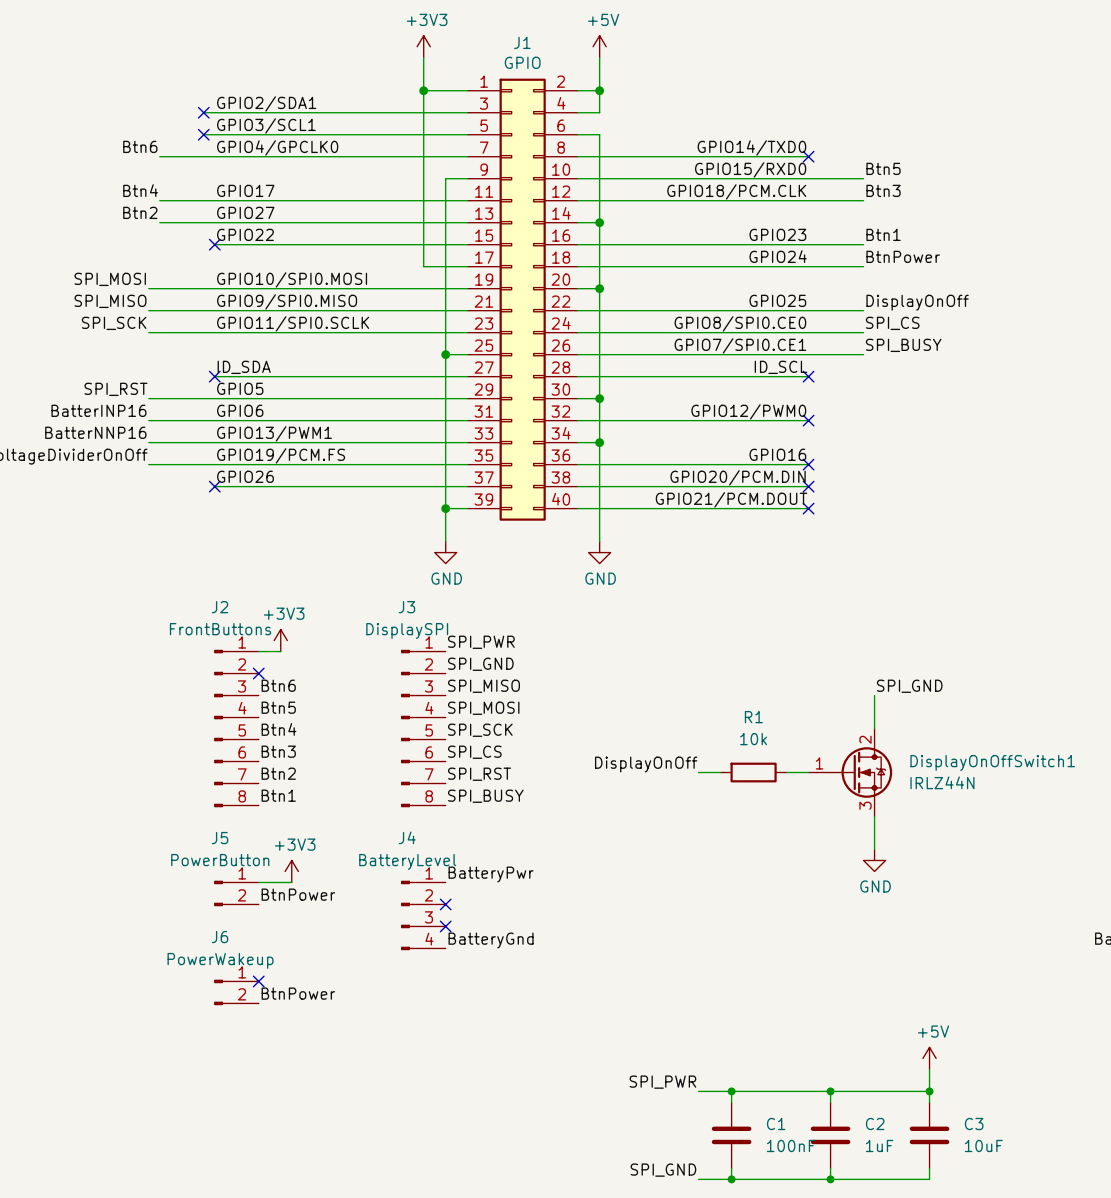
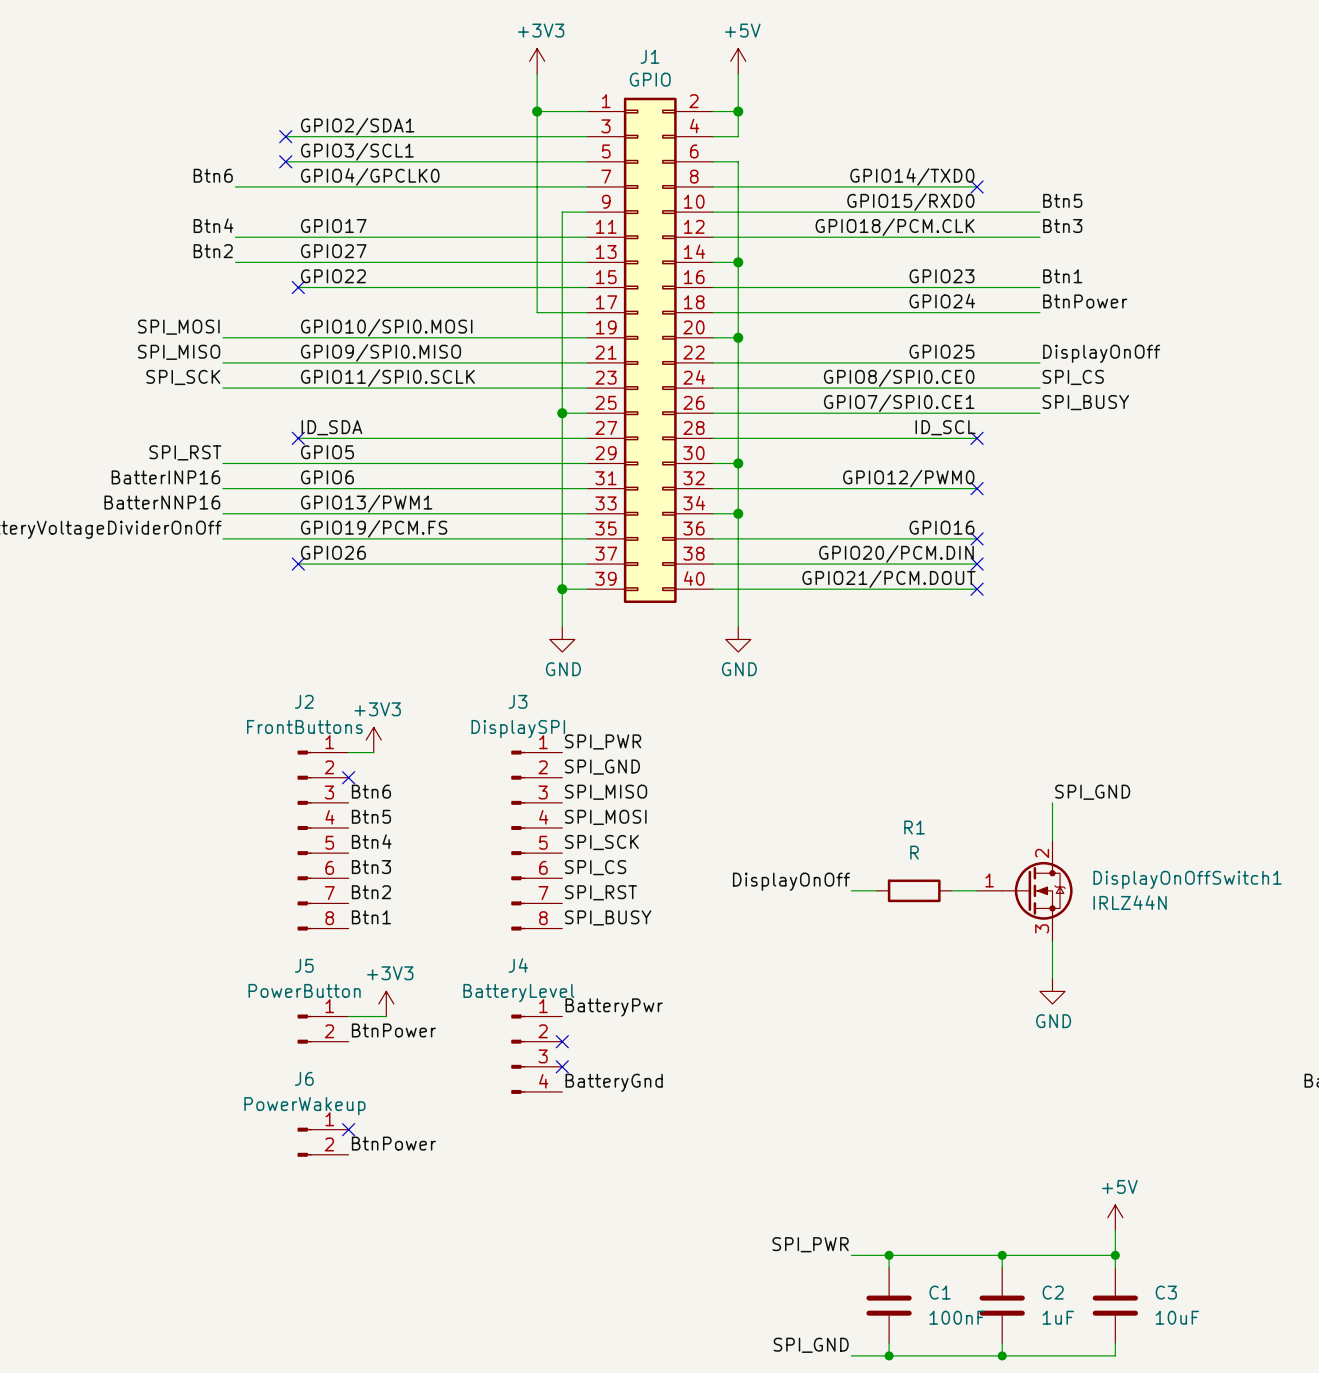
R1 value: 10k (753, 739) -> R (914, 852)

